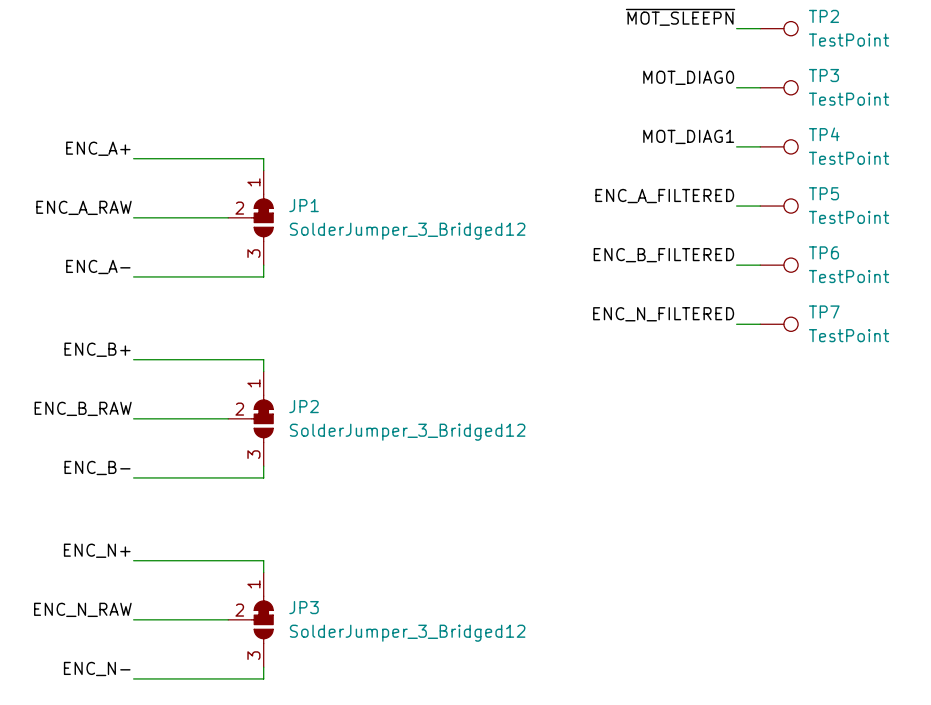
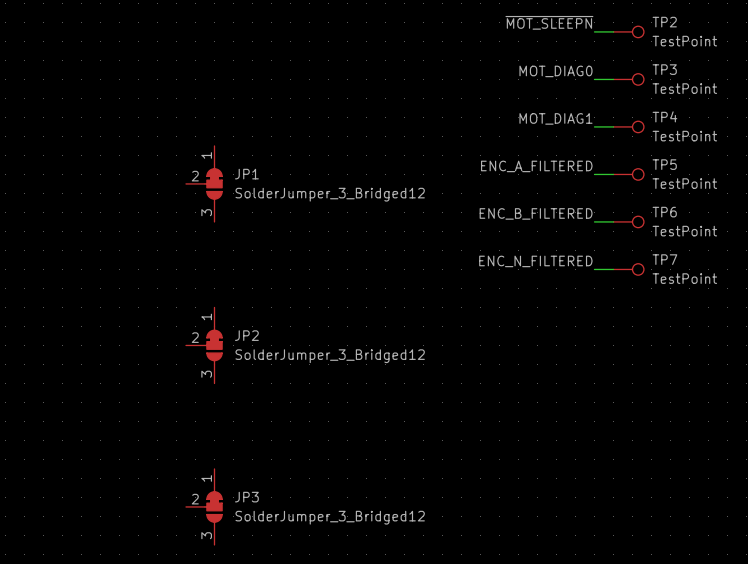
label: ENC_A+ (98, 148) -> none
wire: (133, 158) (263, 158) (263, 170) -> none
label: ENC_A_RAW (83, 207) -> none
wire: (133, 217) (228, 217) -> none
wire: (263, 265) (263, 276) (133, 276) -> none
label: ENC_A- (98, 266) -> none
label: ENC_B+ (97, 349) -> none
wire: (133, 359) (263, 359) (263, 371) -> none
label: ENC_B_RAW (83, 408) -> none
wire: (133, 418) (228, 418) -> none
wire: (263, 466) (263, 477) (133, 477) -> none
label: ENC_B- (97, 467) -> none
label: ENC_N+ (97, 550) -> none
wire: (133, 560) (263, 560) (263, 572) -> none
label: ENC_N_RAW (82, 609) -> none
wire: (133, 619) (228, 619) -> none
wire: (263, 667) (263, 678) (133, 678) -> none
label: ENC_N- (97, 668) -> none

